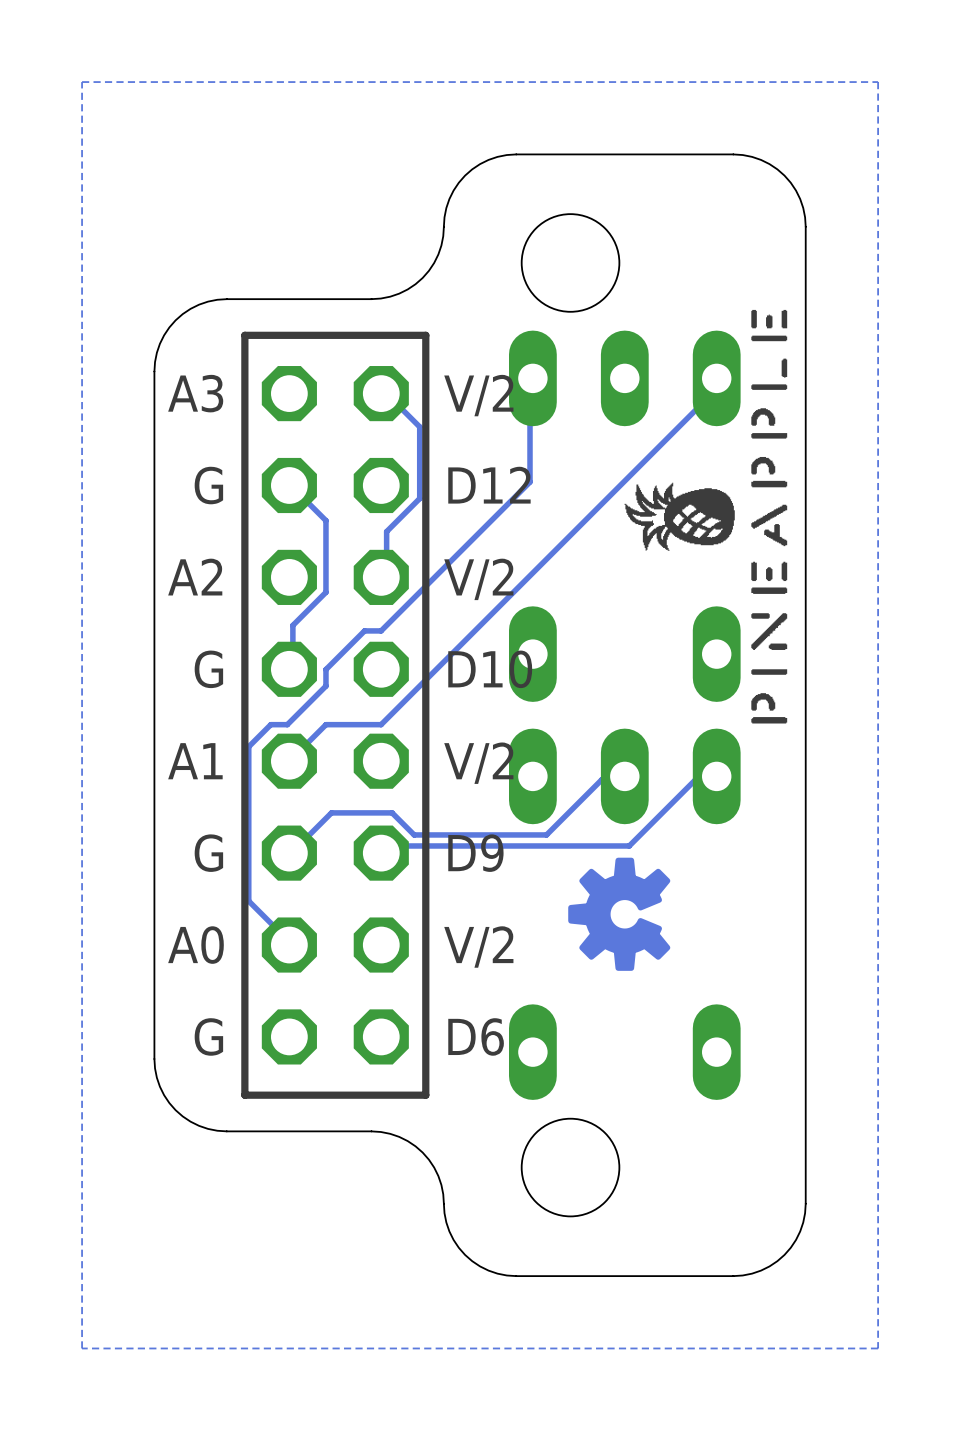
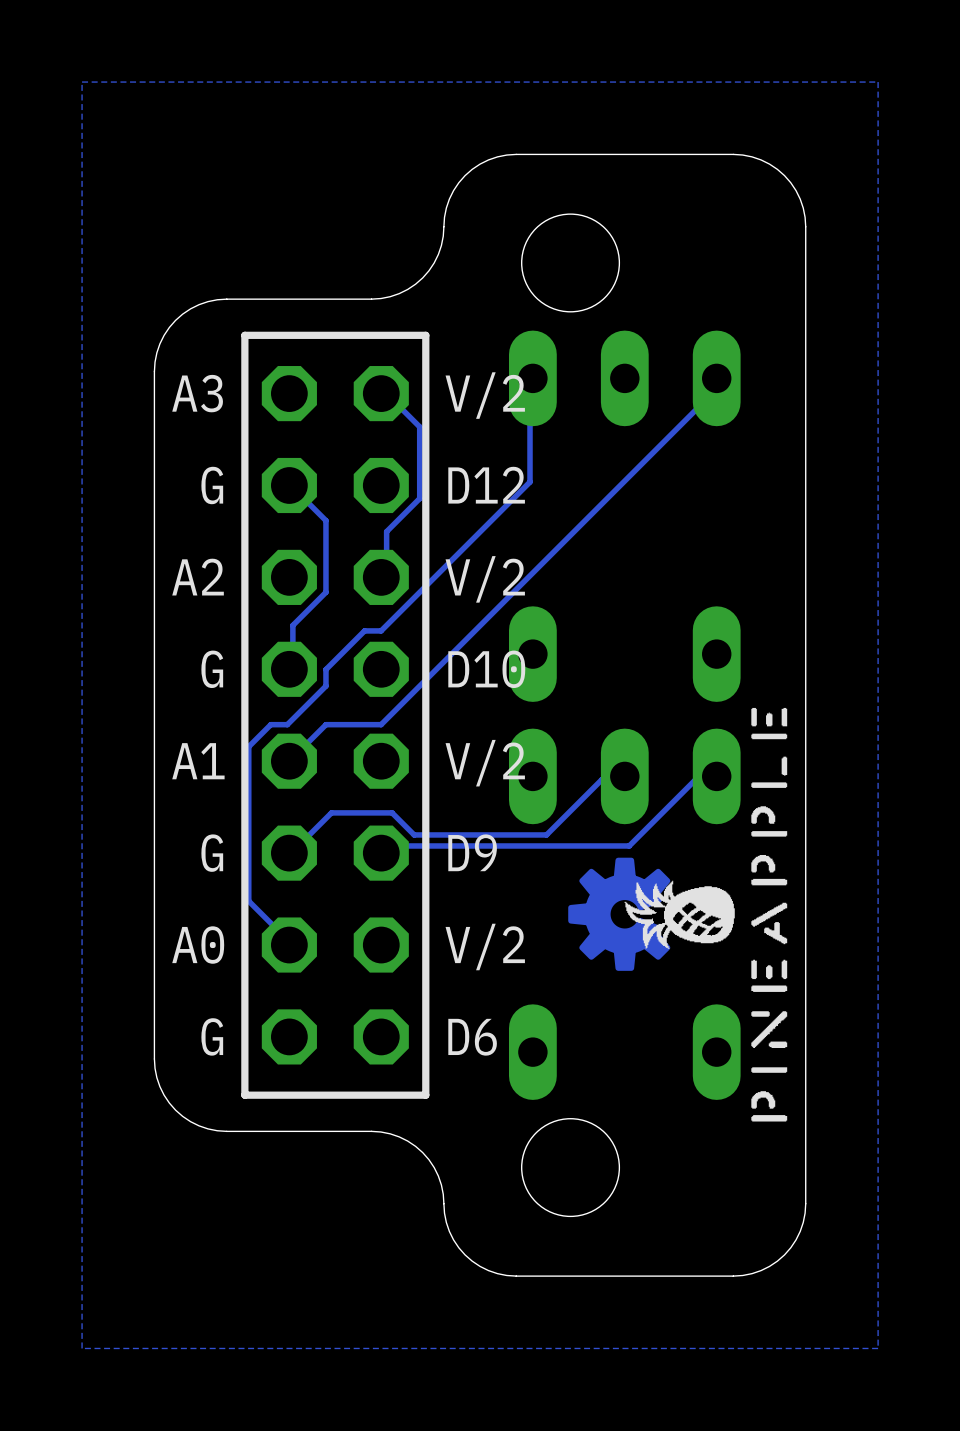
drawing position: (705, 516) -> (705, 914)

